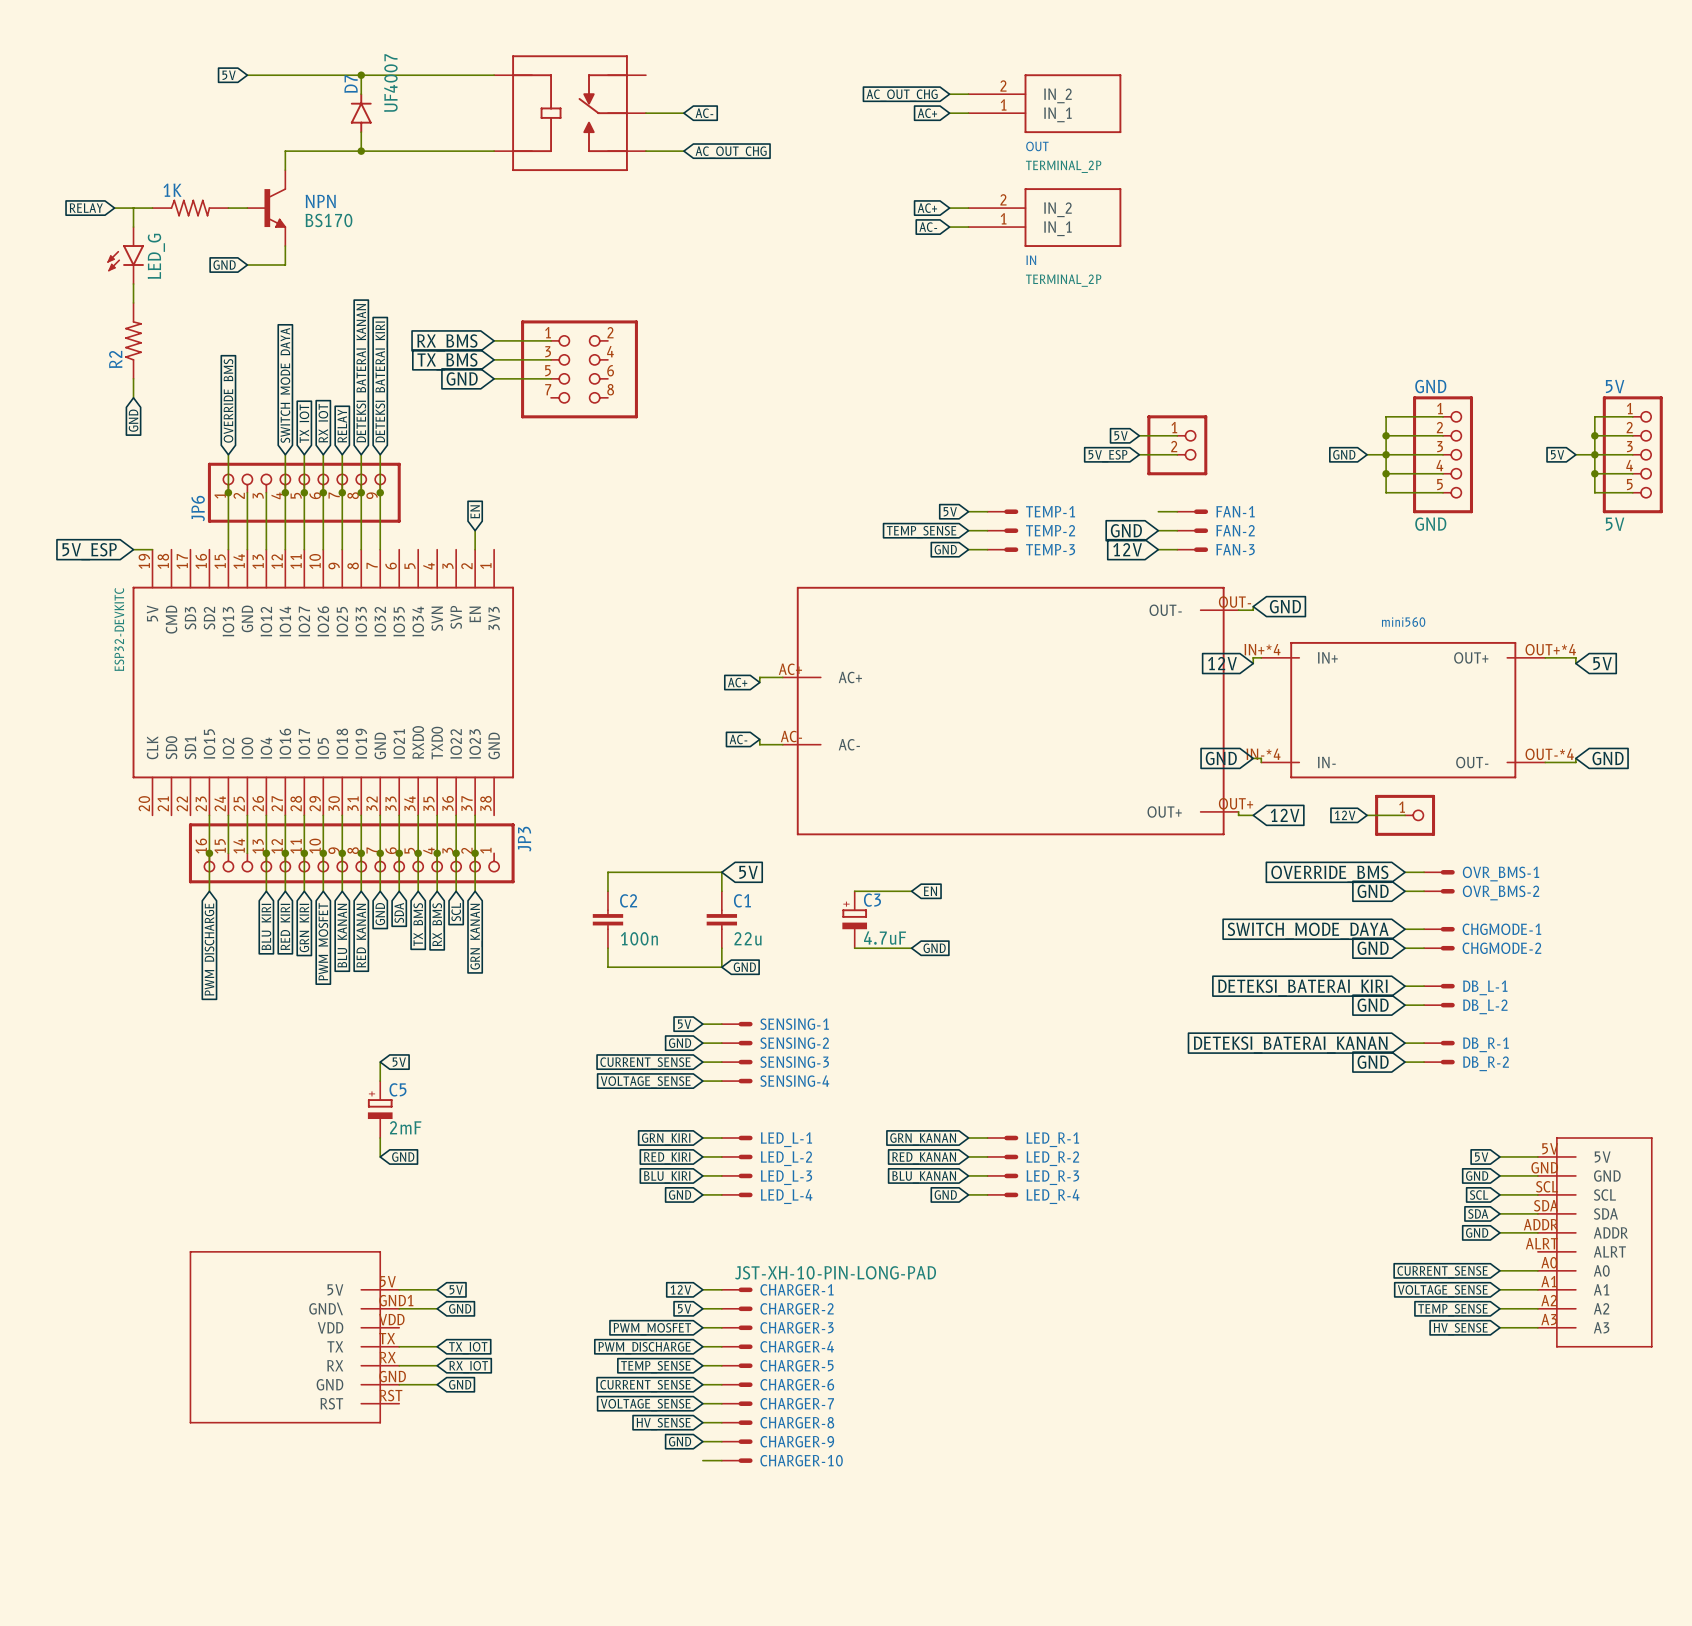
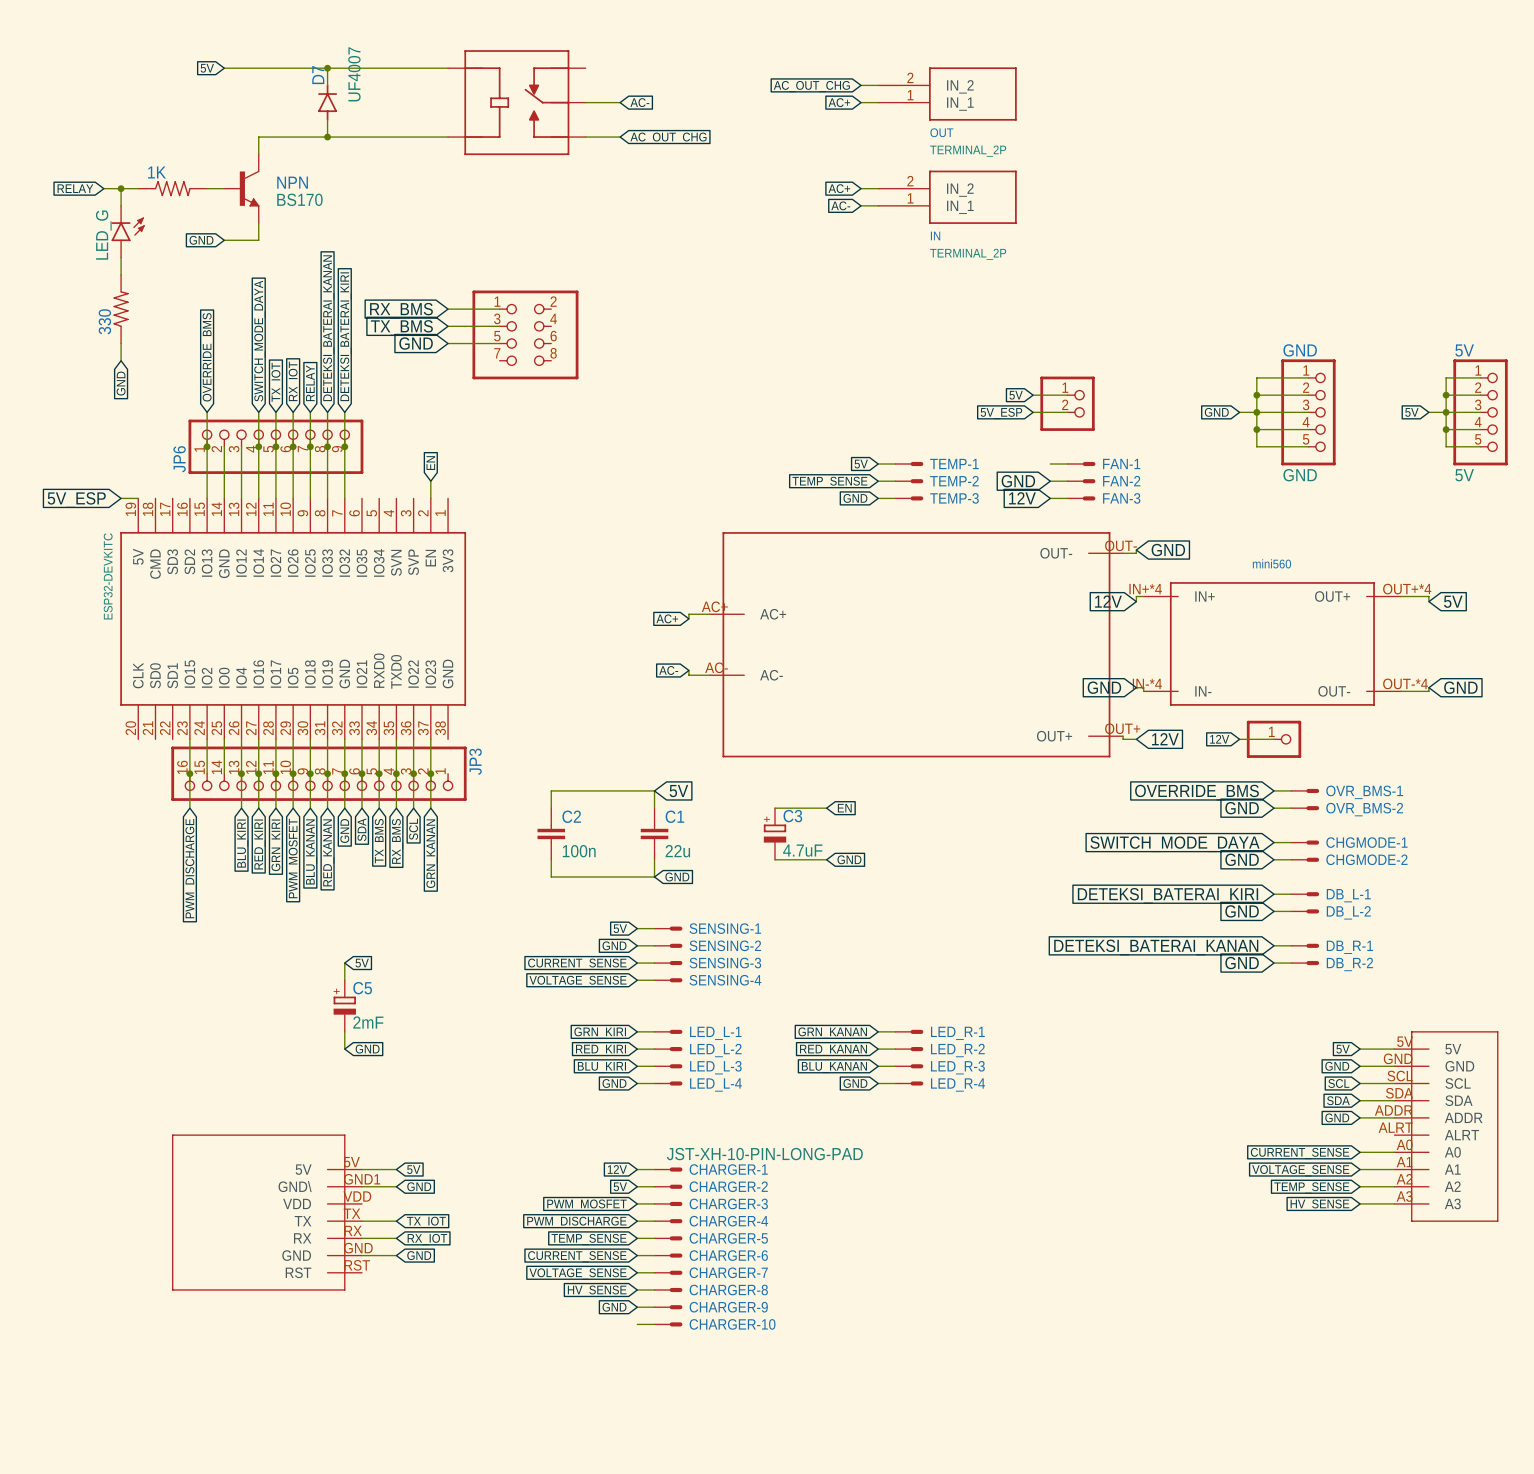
junction: none -> (121, 188)
part rotation: 0° (125, 258) -> 180° (128, 229)
R2 name: R2 (115, 359) -> 330 (104, 321)

